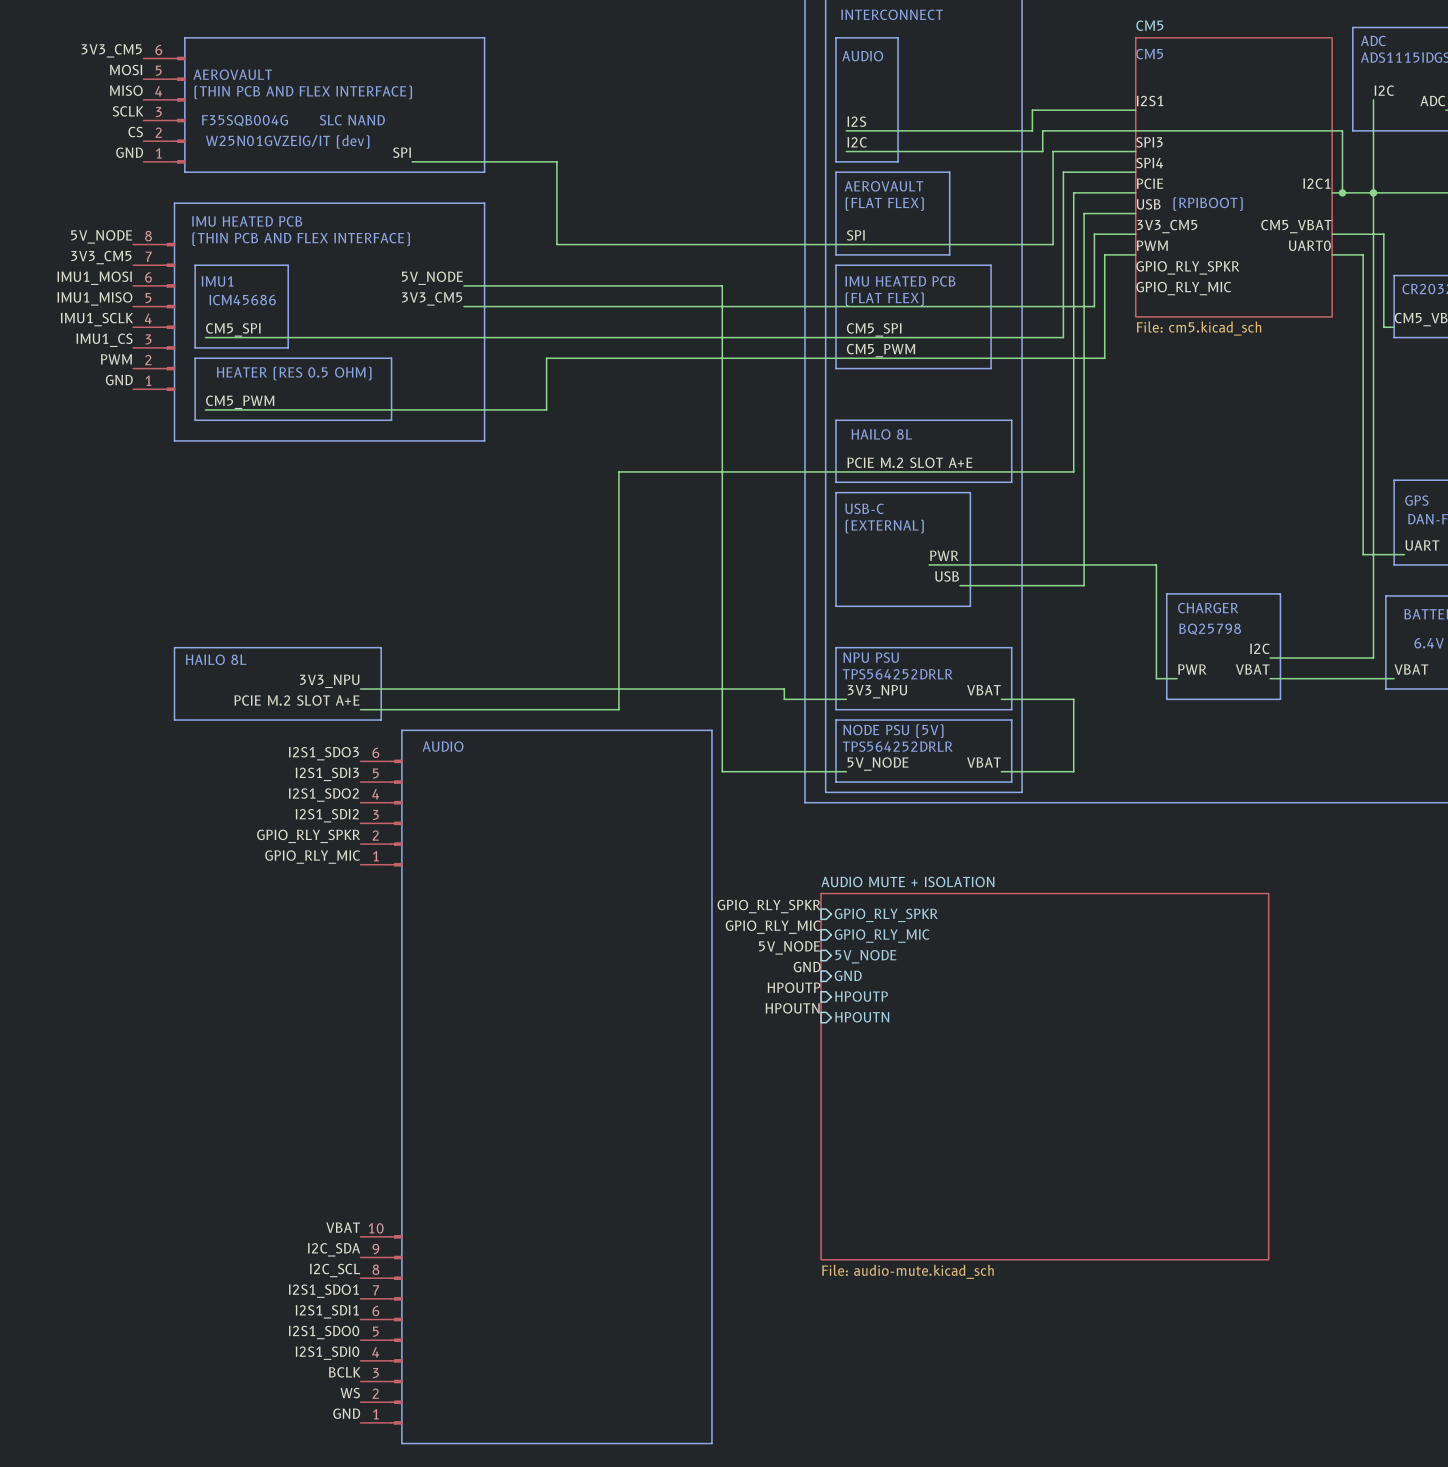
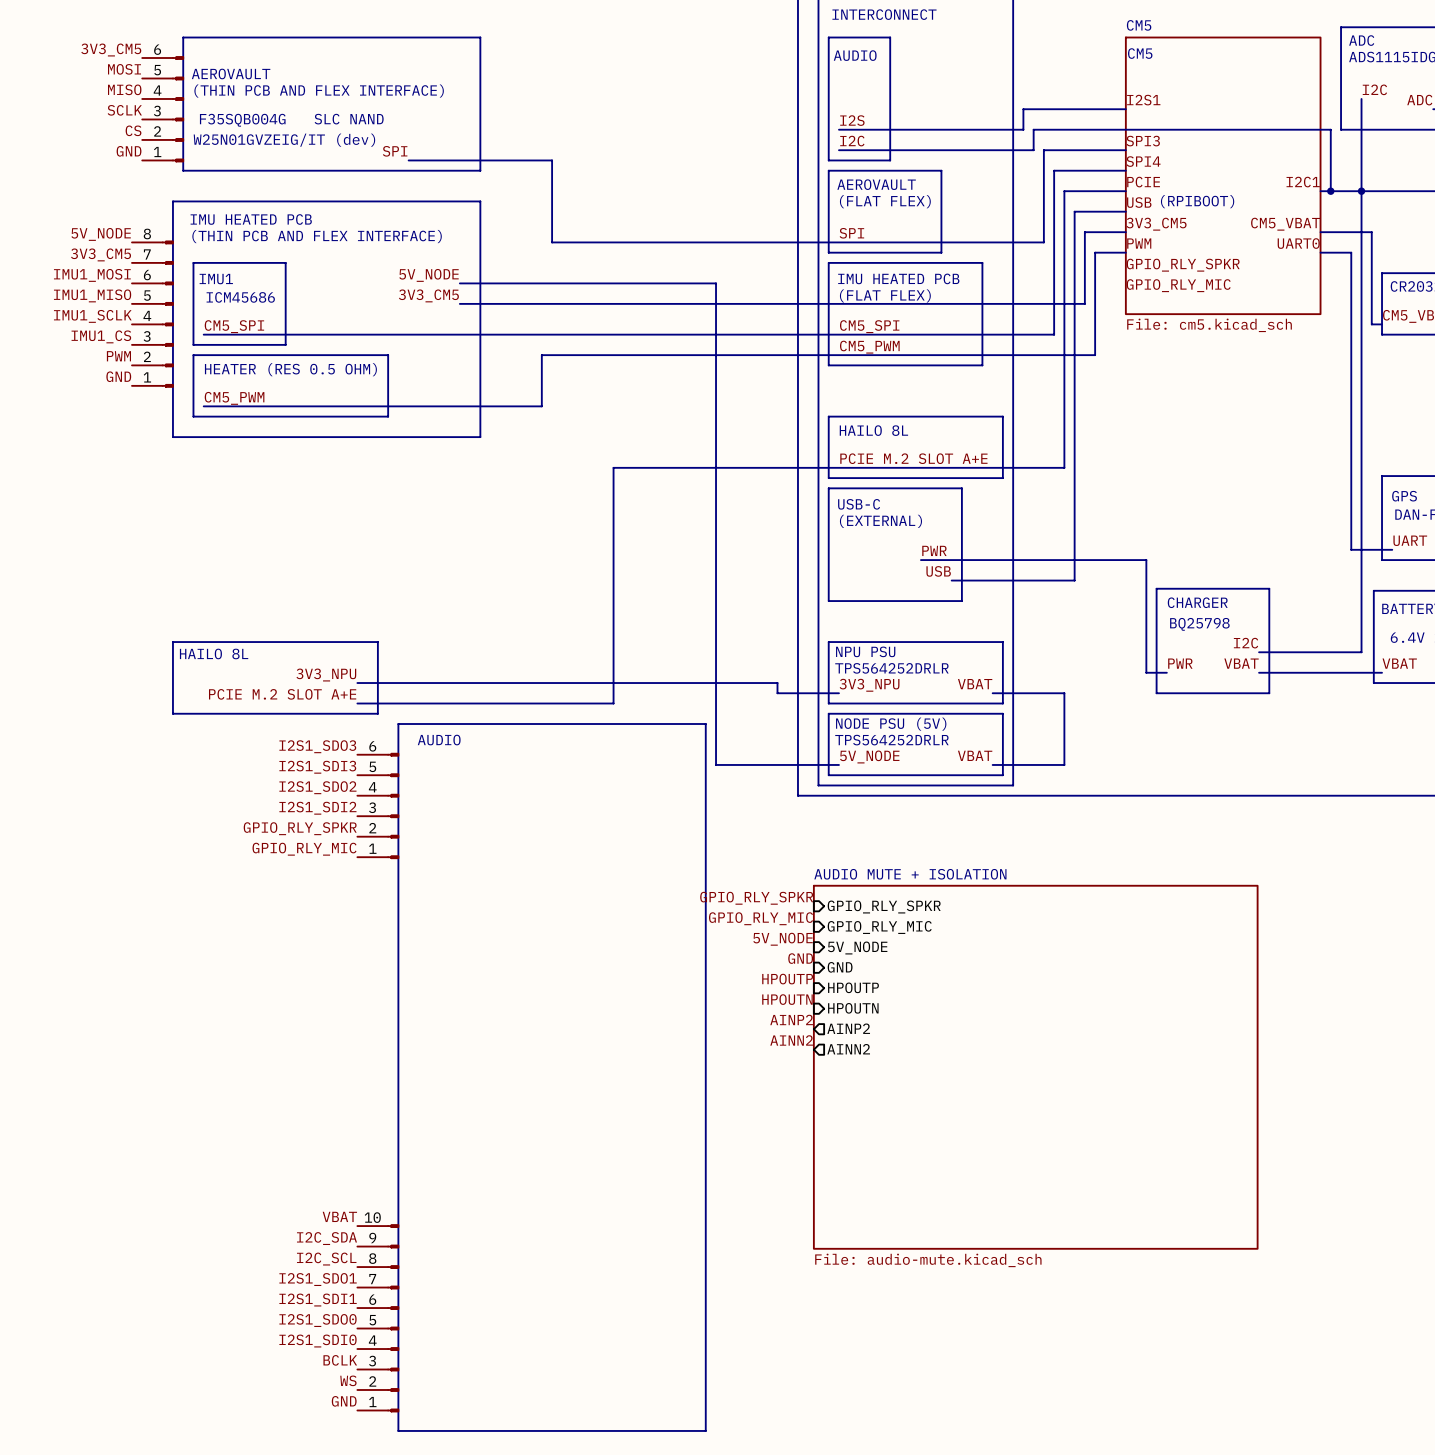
label: none -> AINP2 (791, 1019)
sheet pin: none -> AINP2 (848, 1028)
label: none -> AINN2 (791, 1040)
sheet pin: none -> AINN2 (848, 1049)

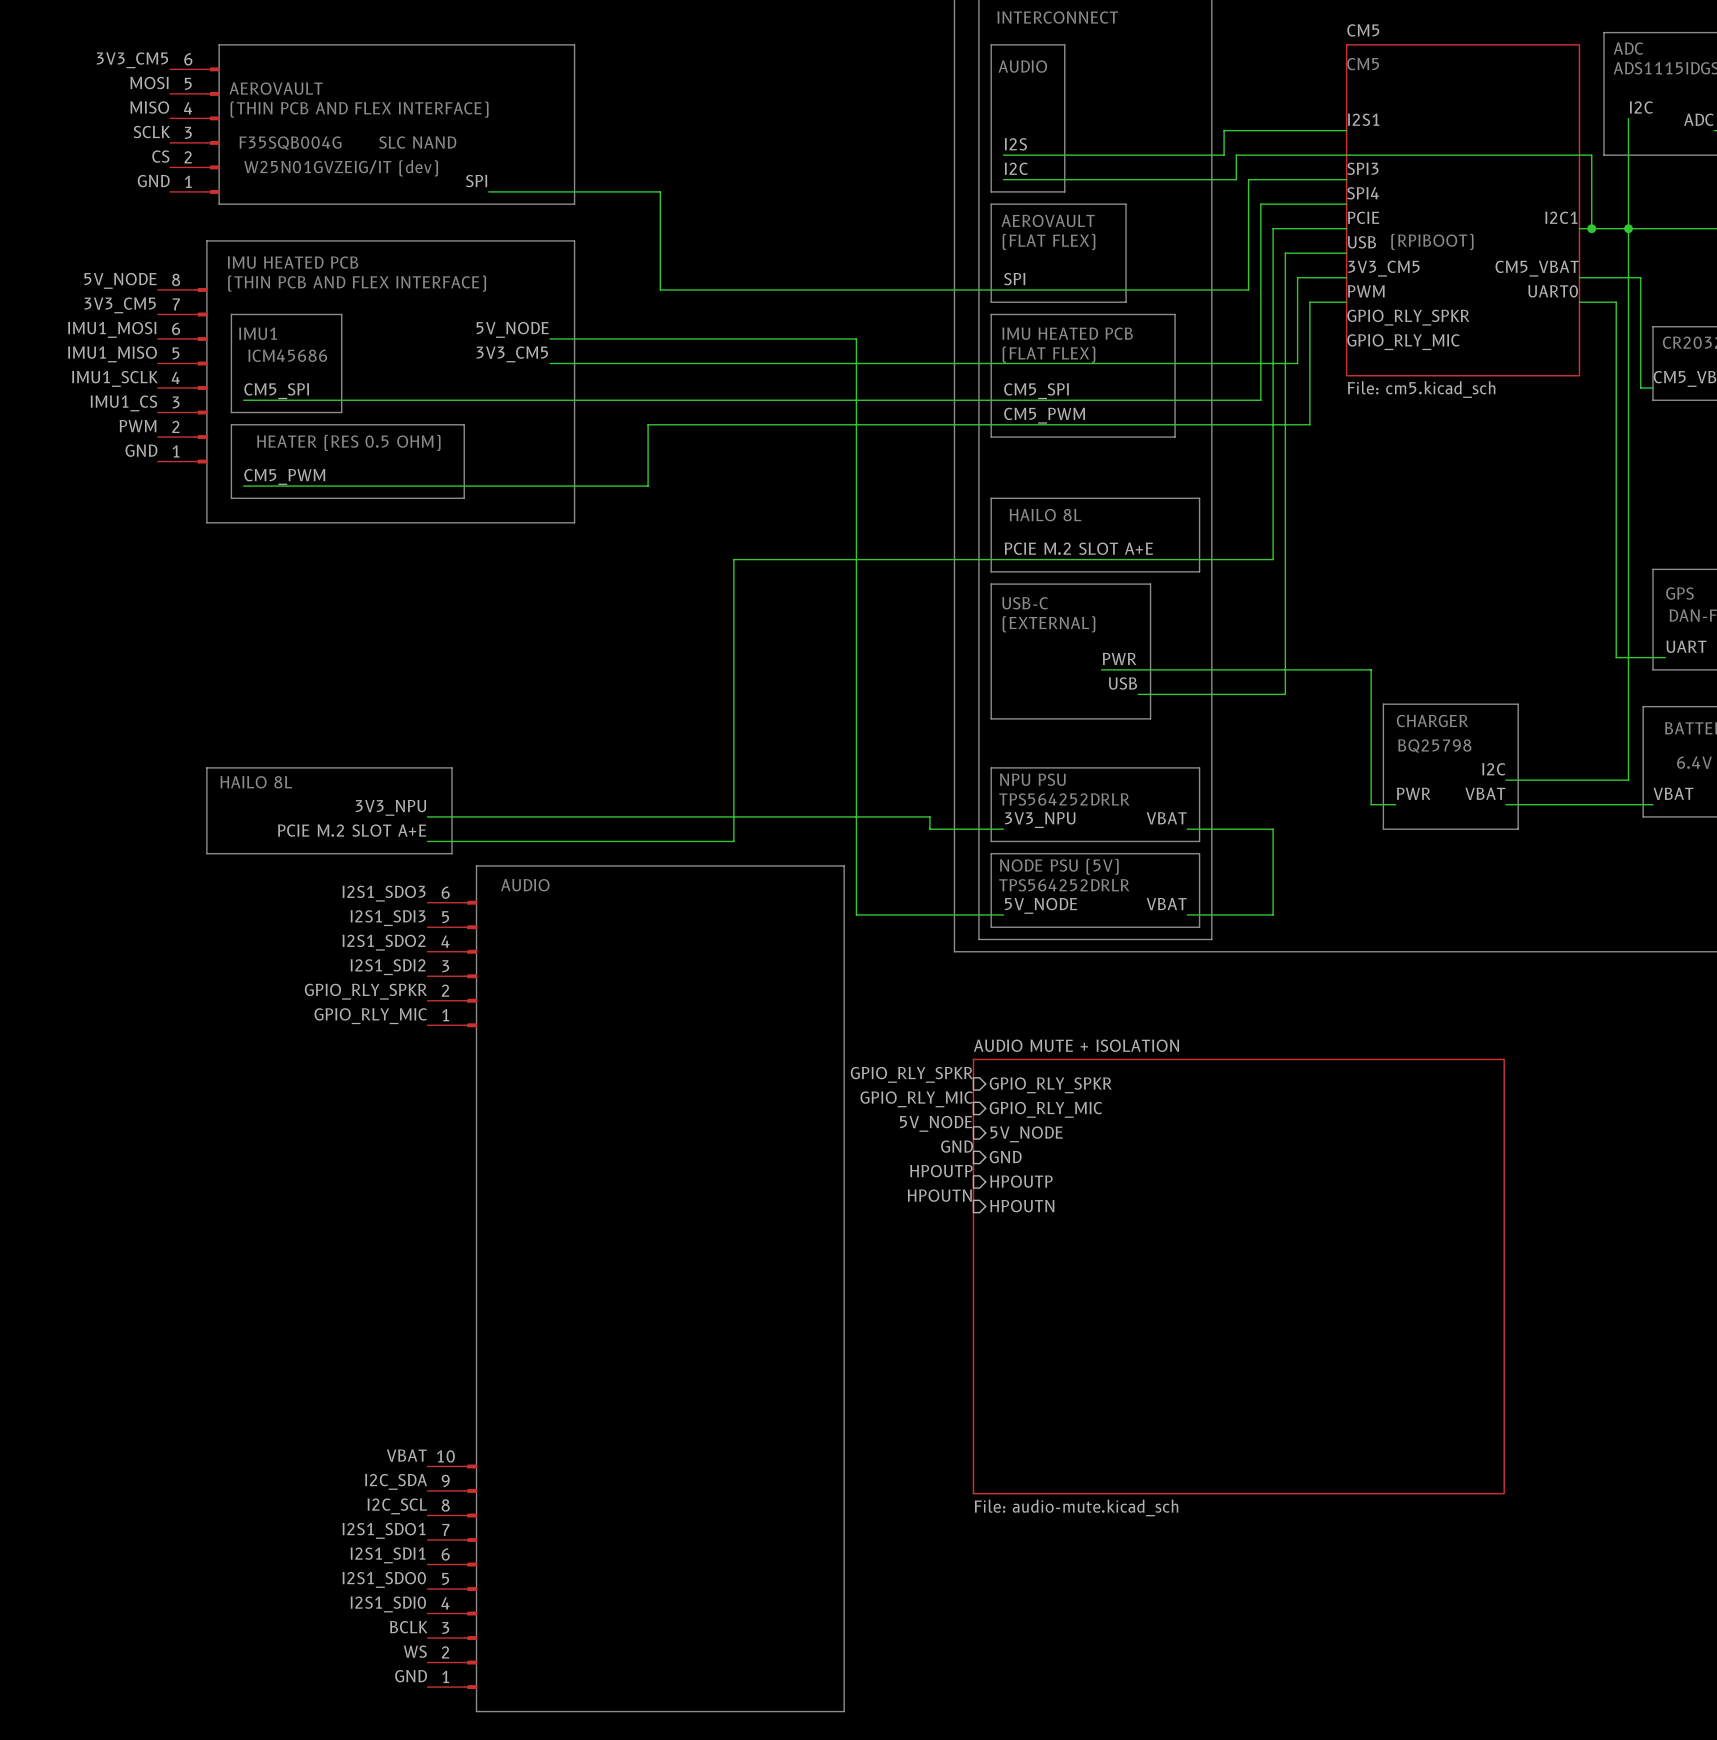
label: AINP2 (791, 1019) -> none
sheet pin: AINP2 (848, 1028) -> none
label: AINN2 (791, 1040) -> none
sheet pin: AINN2 (848, 1049) -> none

